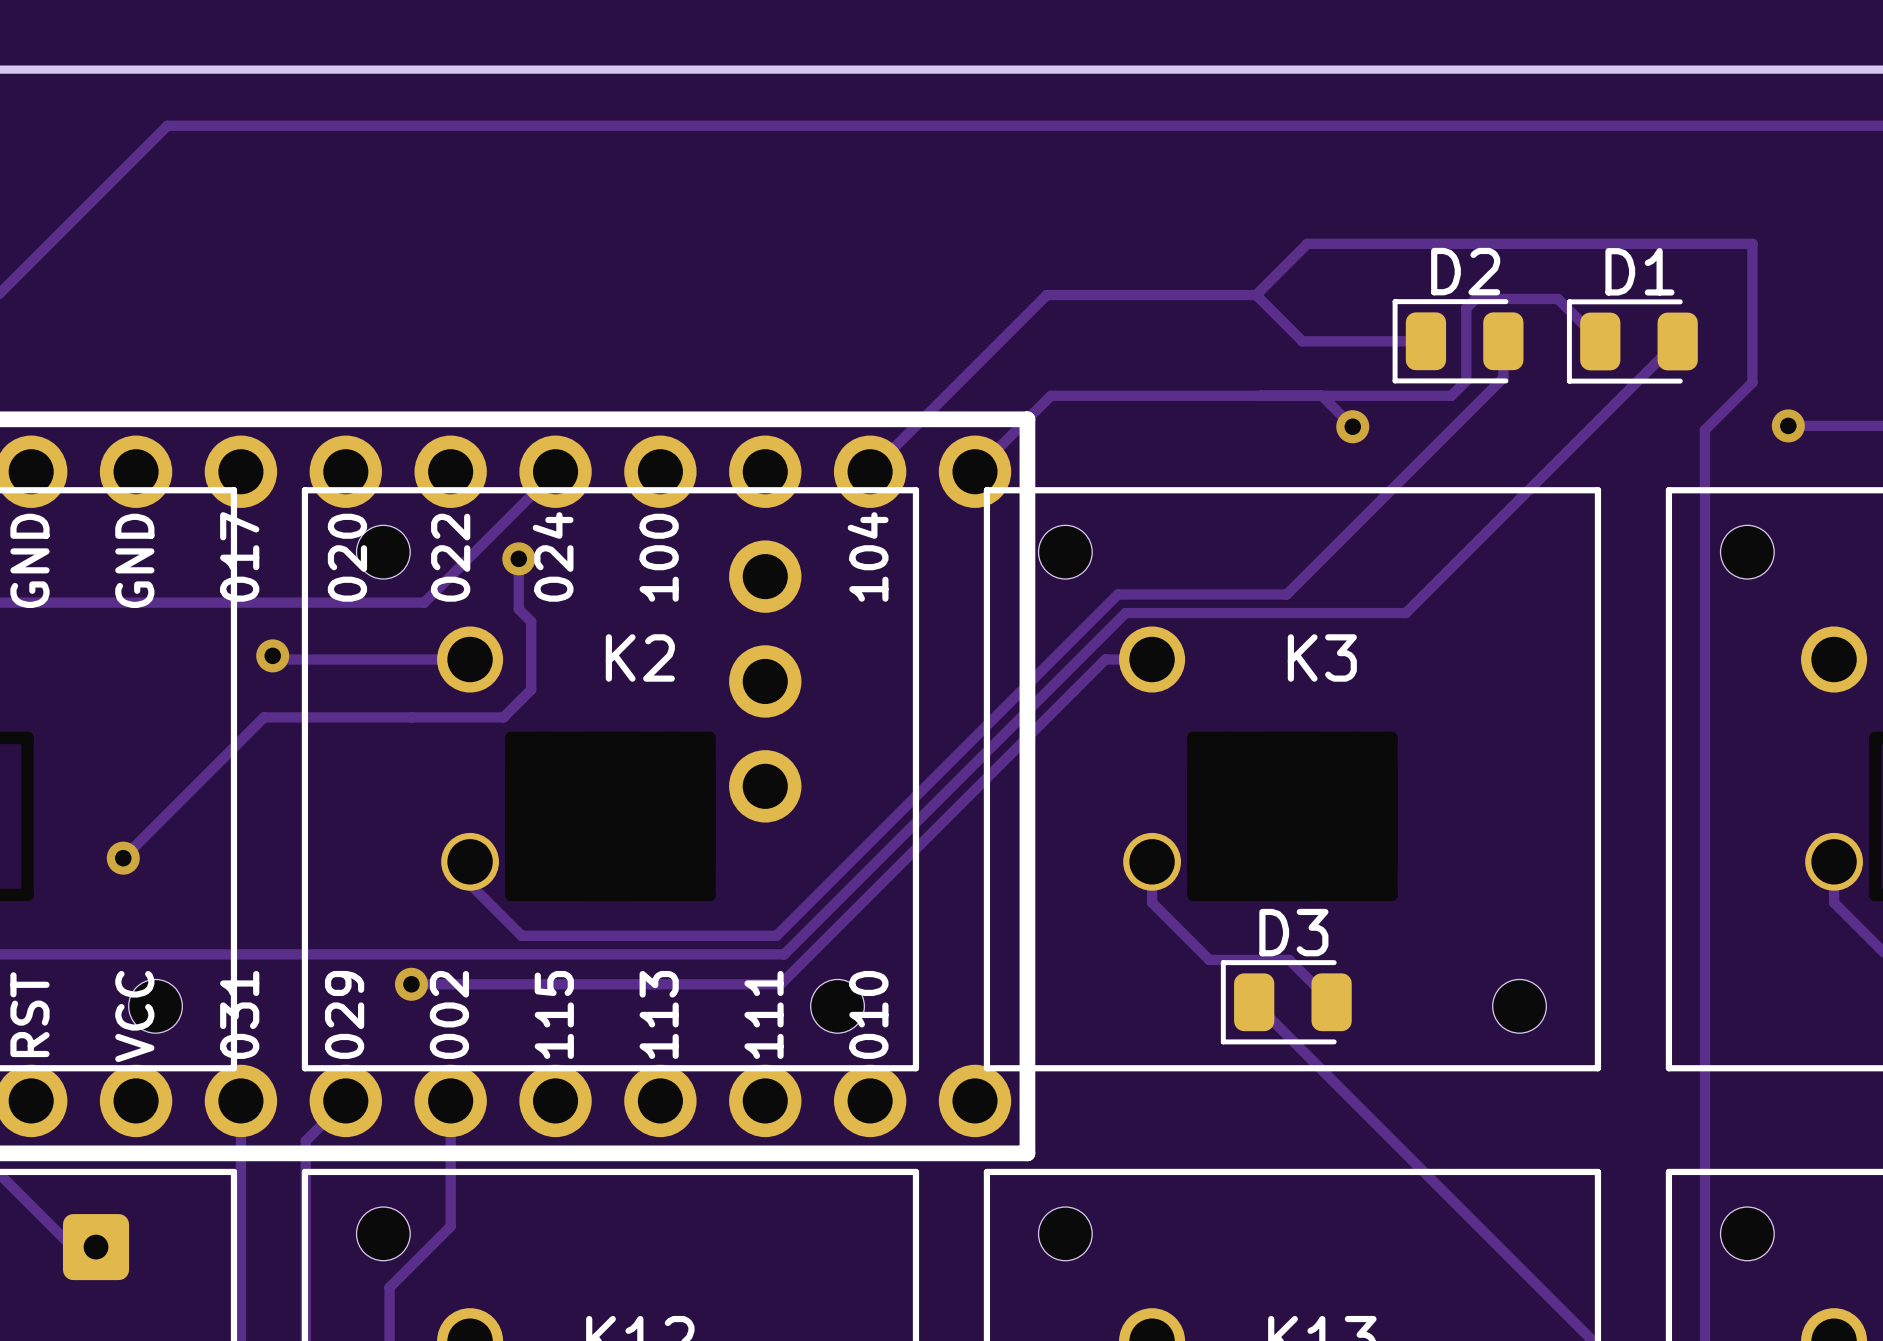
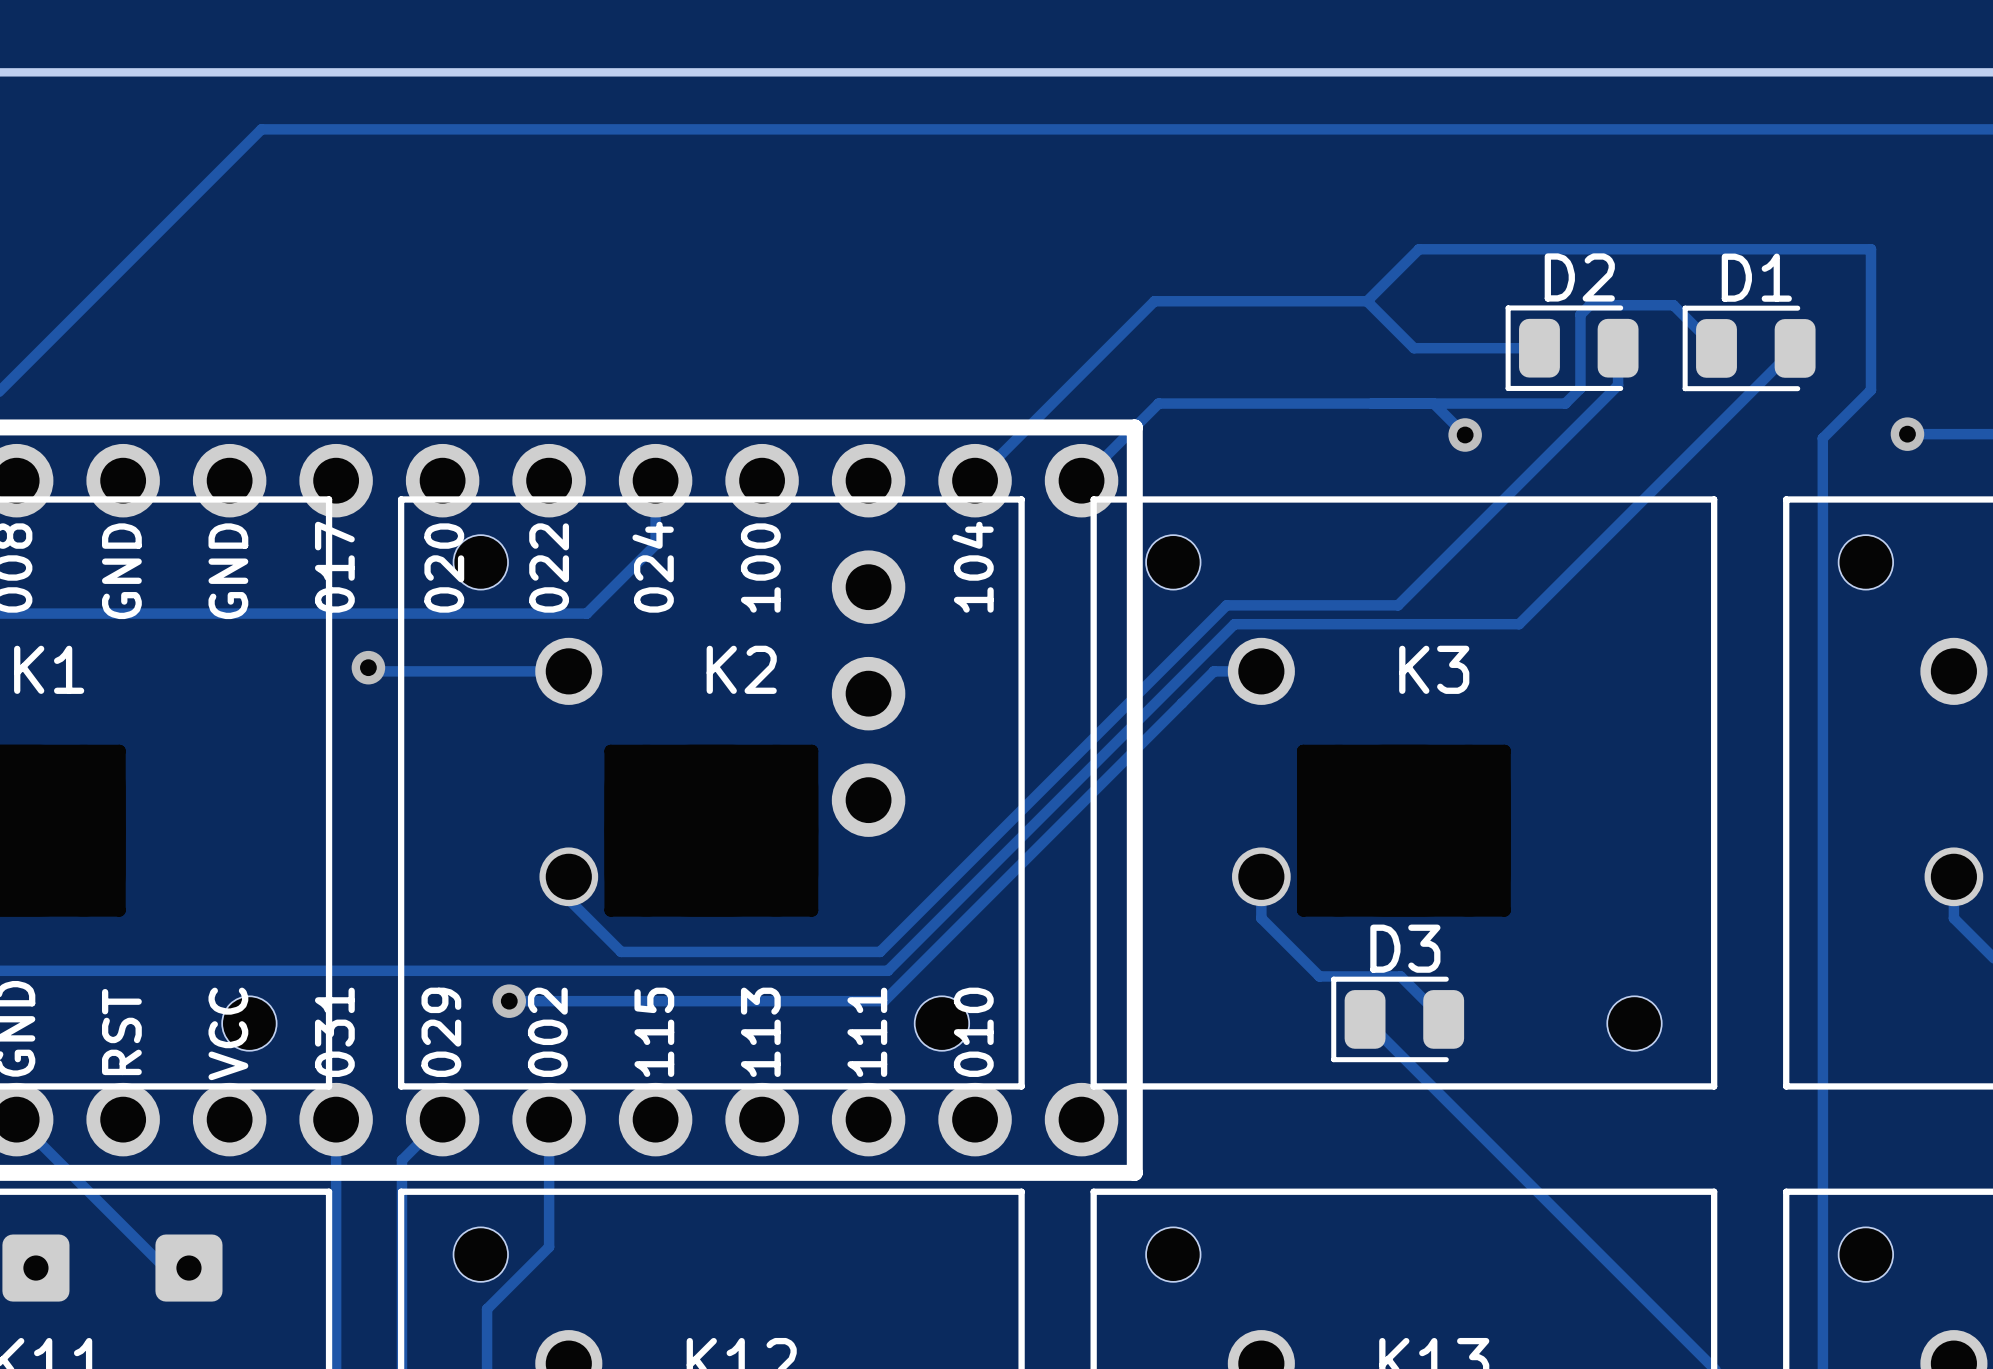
track: (555, 471) (424, 602) -> (655, 480) (655, 544) (586, 613) (522, 613)
track: (518, 558) (518, 609) (531, 621) (531, 689) (503, 717) (264, 717) (123, 858) -> none
via: (518, 558) -> none
via: (123, 858) -> none

